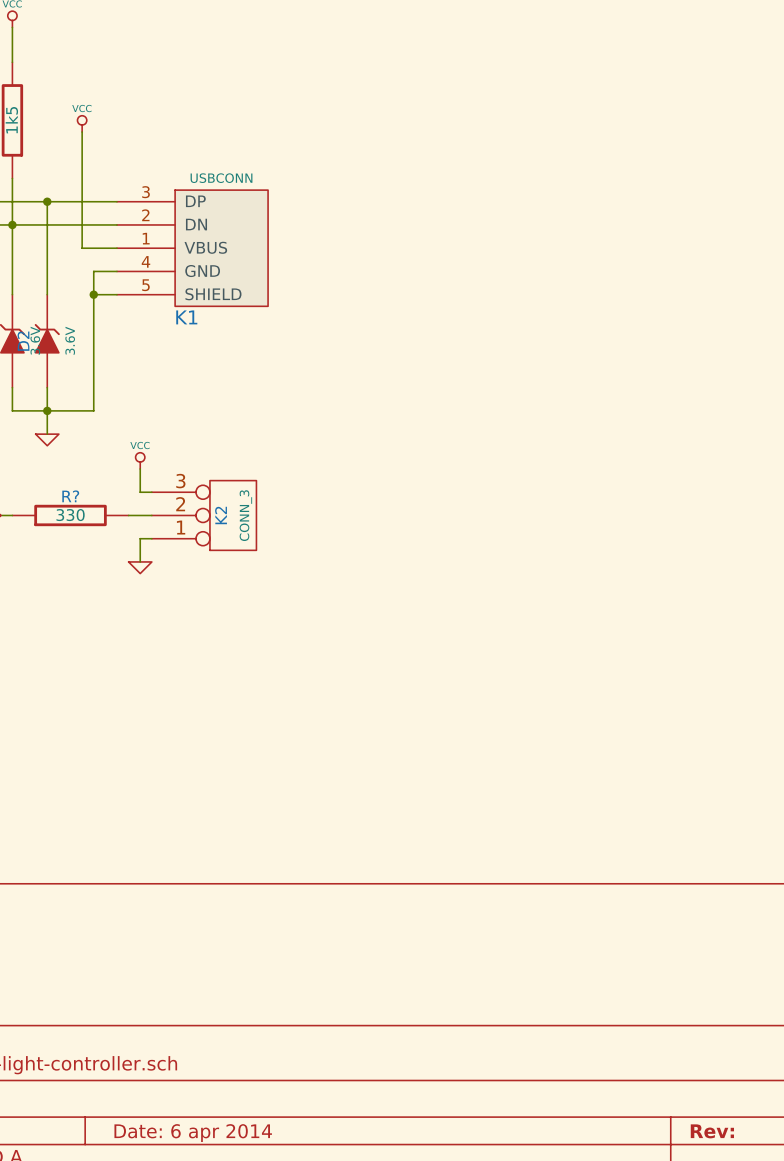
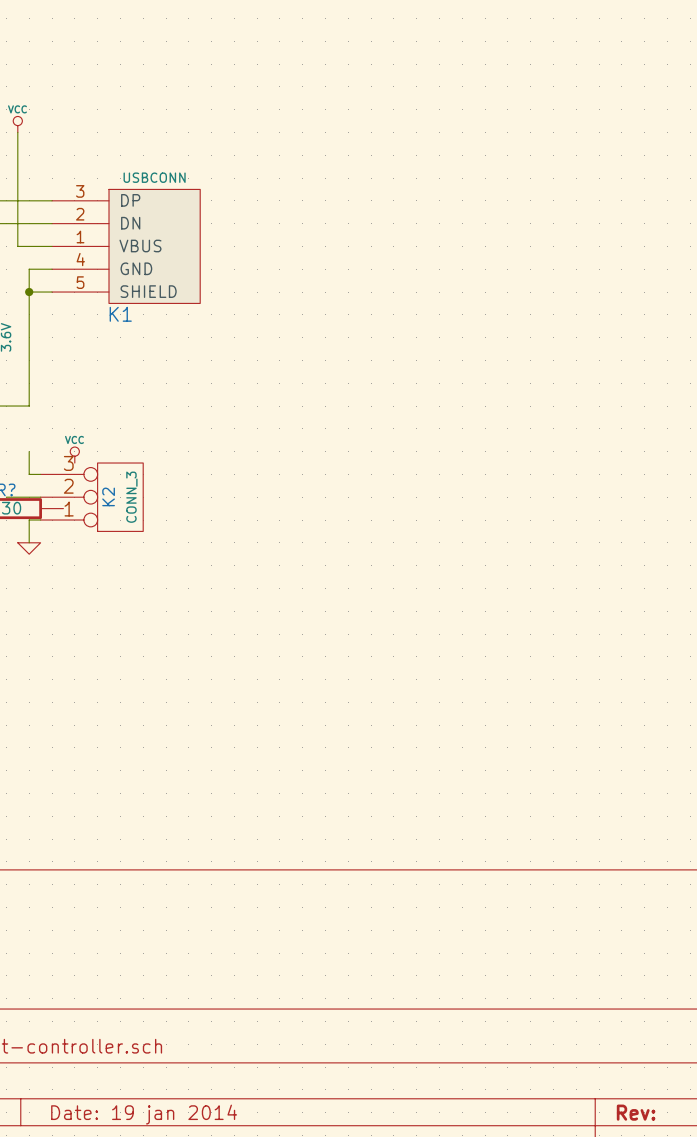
wire: (140, 469) (140, 492) (151, 492) -> (29, 451) (29, 474) (40, 474)
wire: none -> (6, 497) (40, 497)
wire: (128, 515) (151, 515) -> none
K2 position: (204, 515) -> (91, 497)
wire: (151, 538) (140, 538) (140, 561) -> (40, 520) (29, 520) (29, 542)
power symbol position: (140, 567) -> (29, 548)
title block: Date: 6 apr 2014 (193, 1133) -> Date: 19 jan 2014 (144, 1114)

